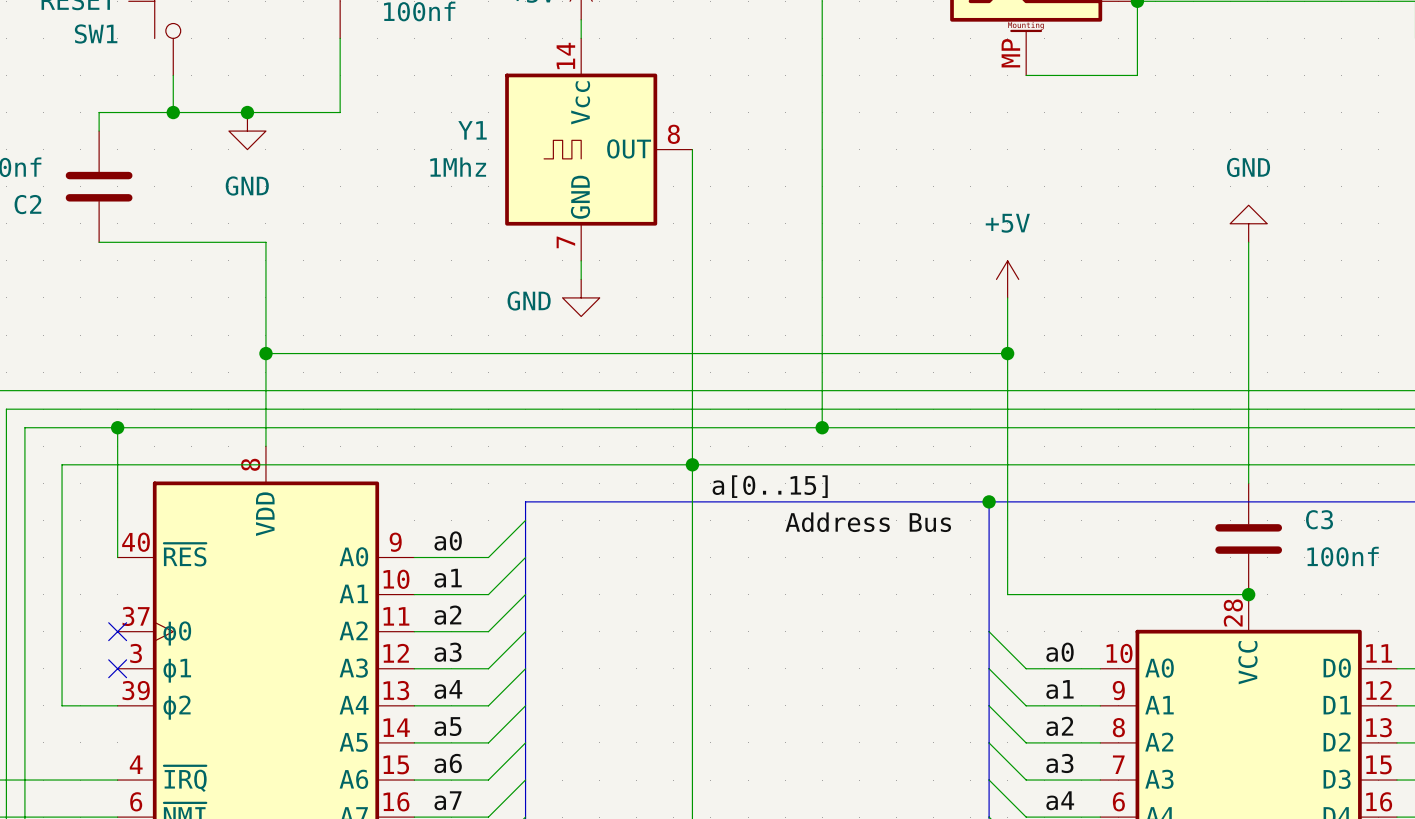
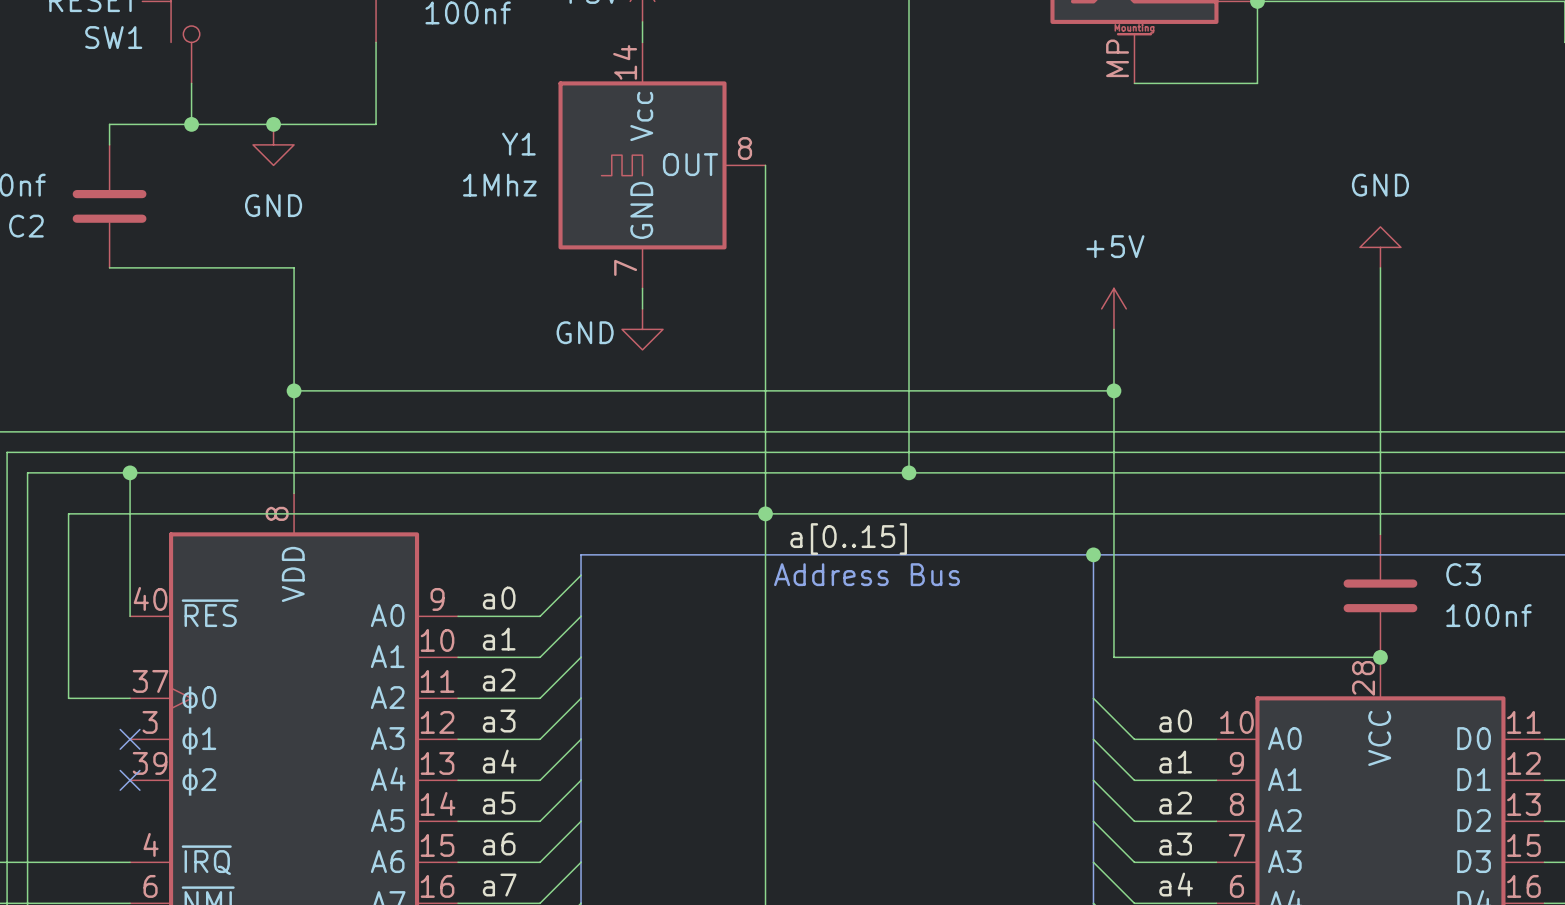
text: none -> Address Bus (867, 574)
label: Address Bus (868, 522) -> none
wire: (62, 631) (62, 705) (117, 705) -> (68, 698) (130, 698)
no-connect mark position: (117, 631) -> (130, 780)

